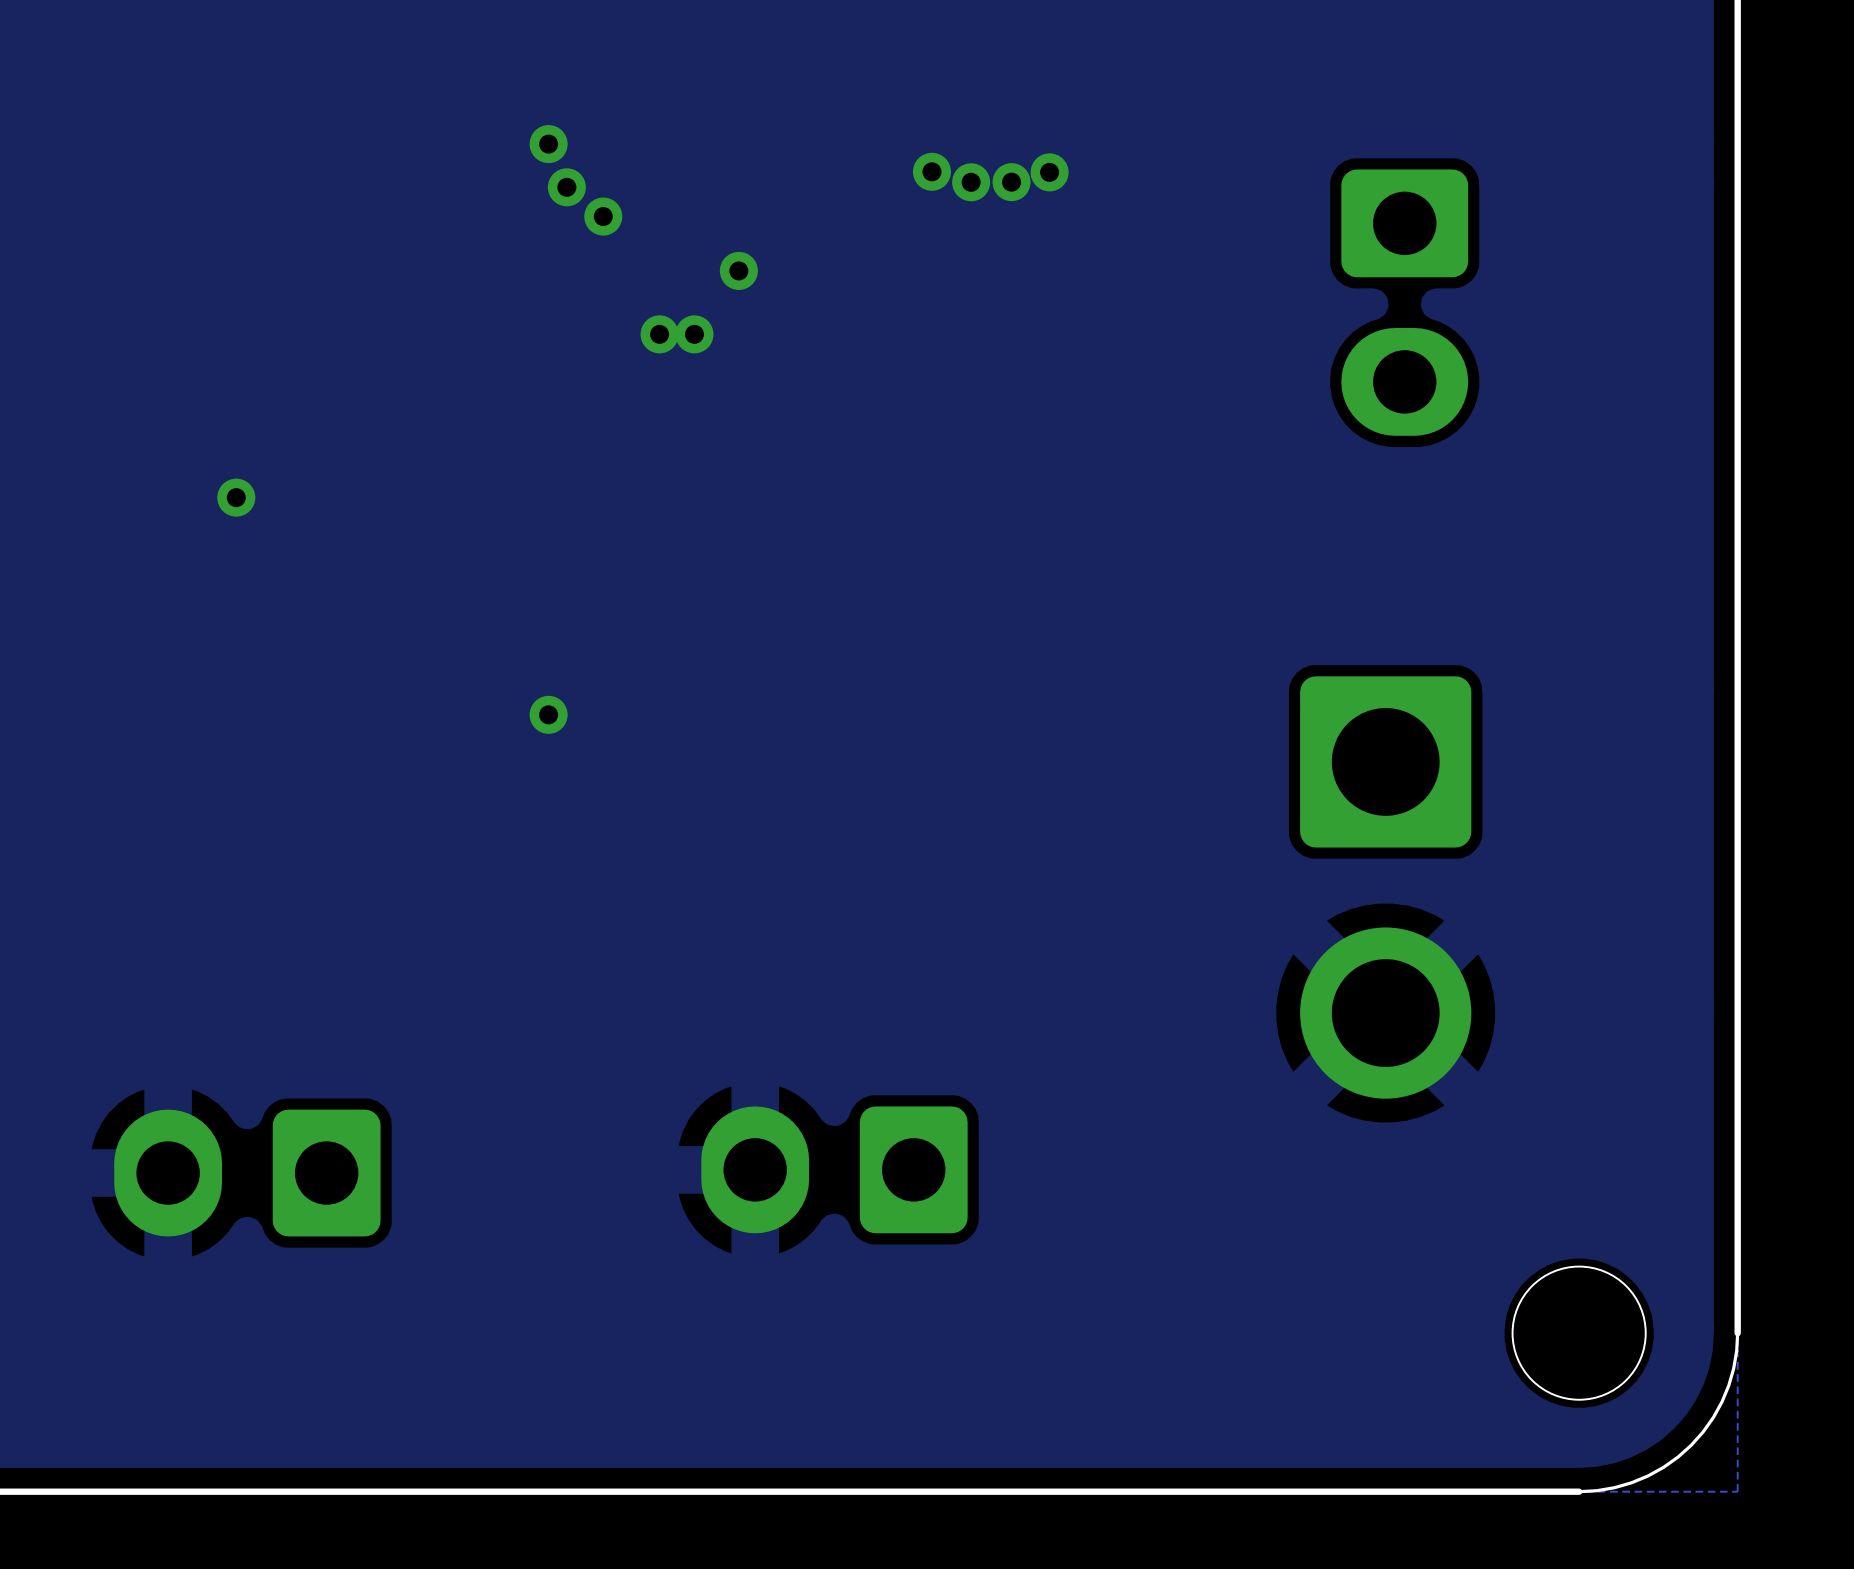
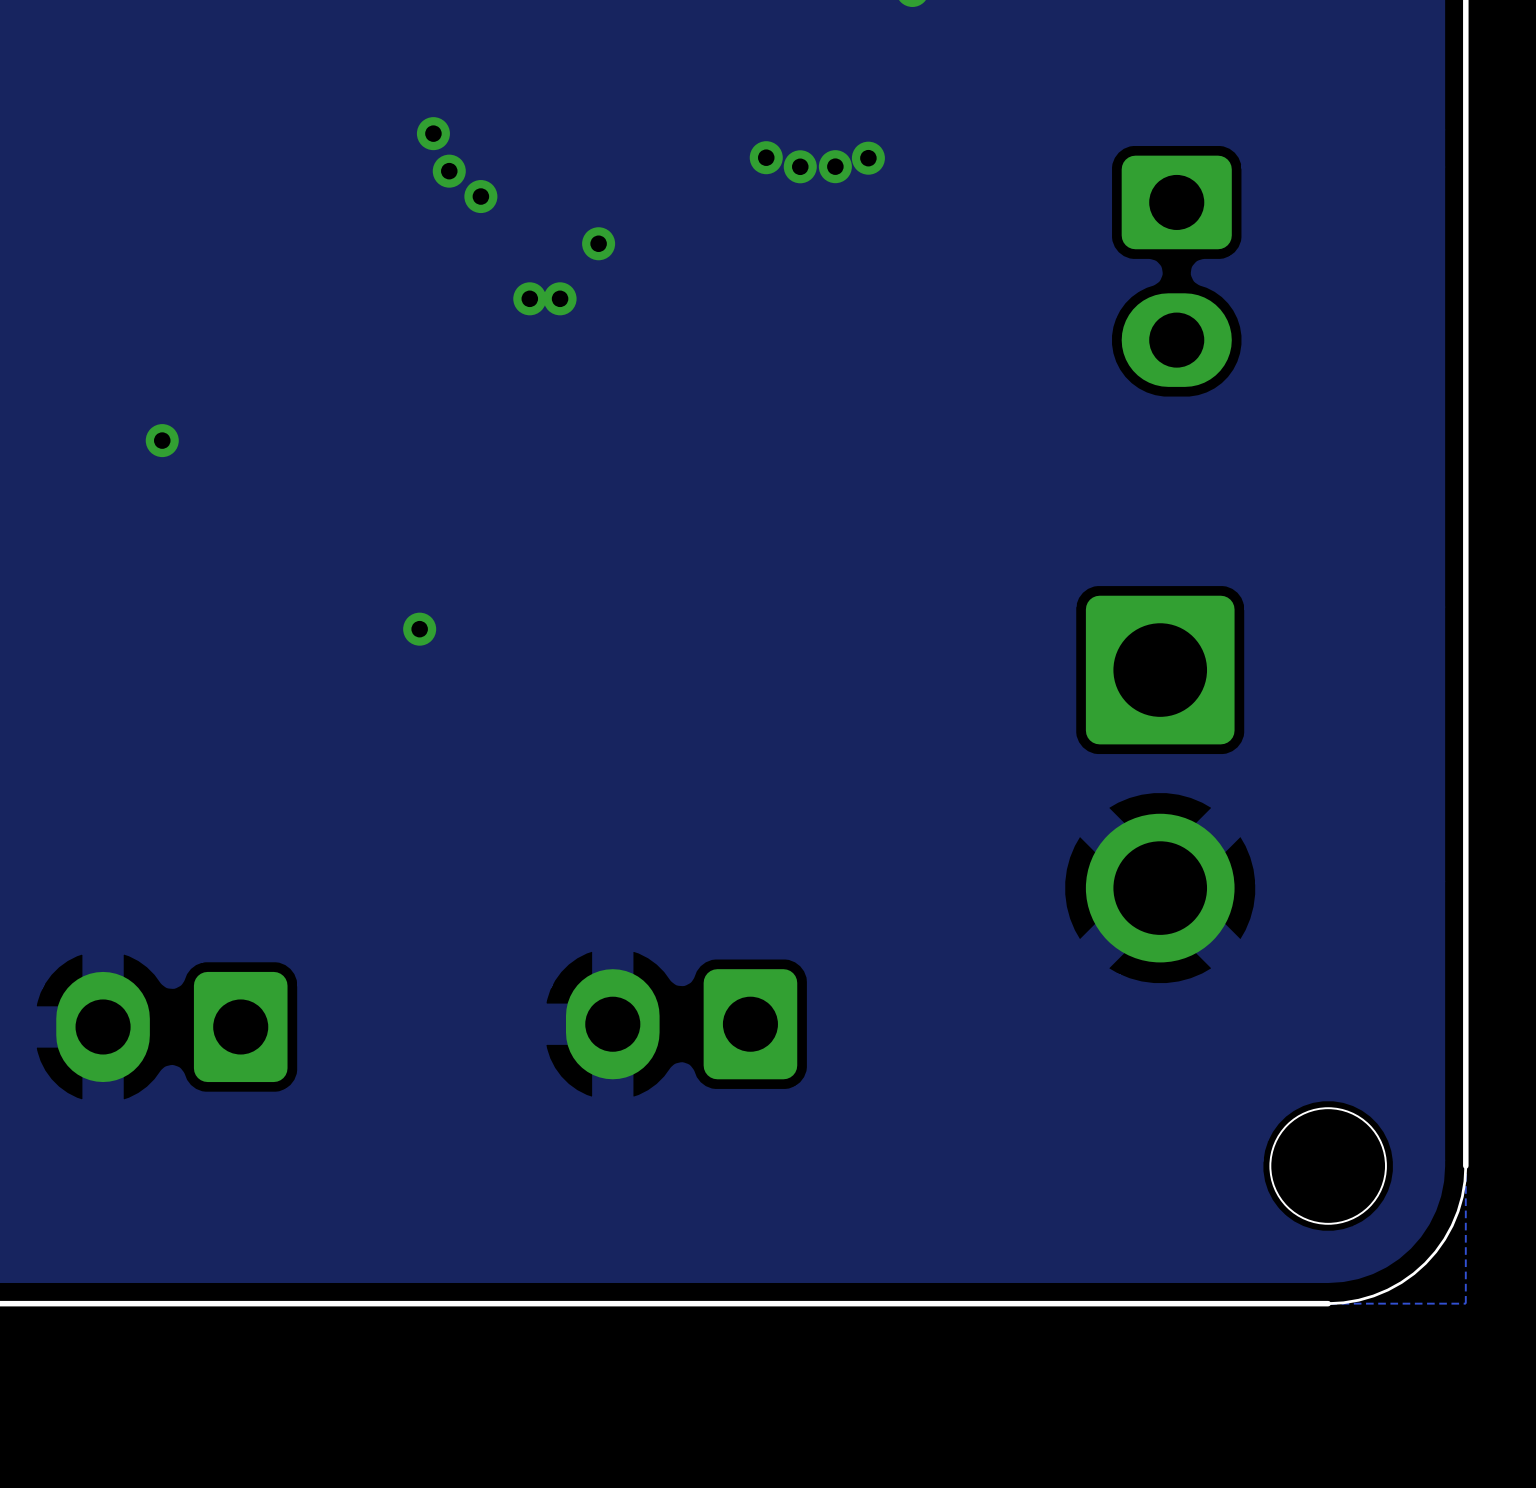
via position: (548, 714) -> (419, 629)

